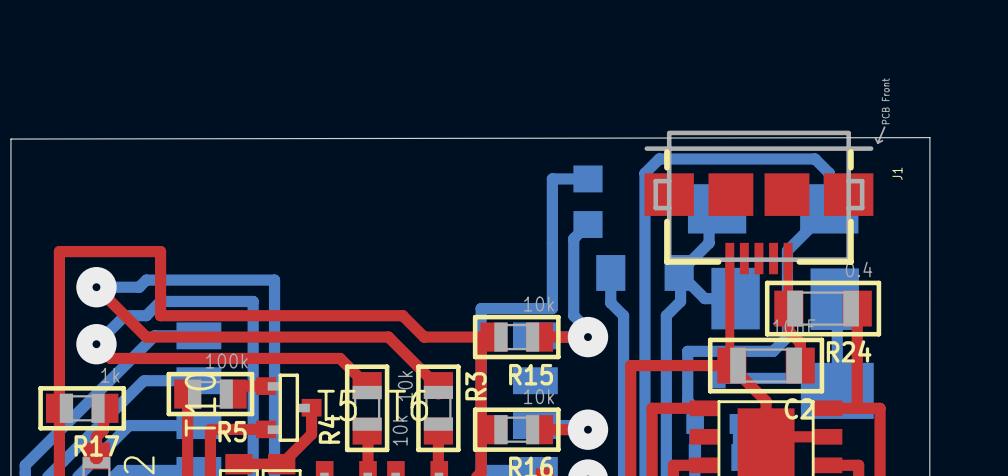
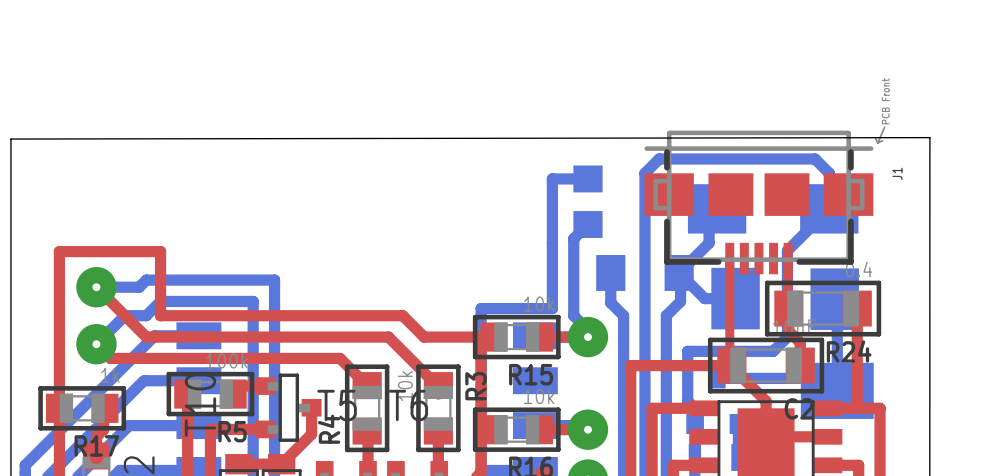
R4 value: 10k (400, 430) -> none

